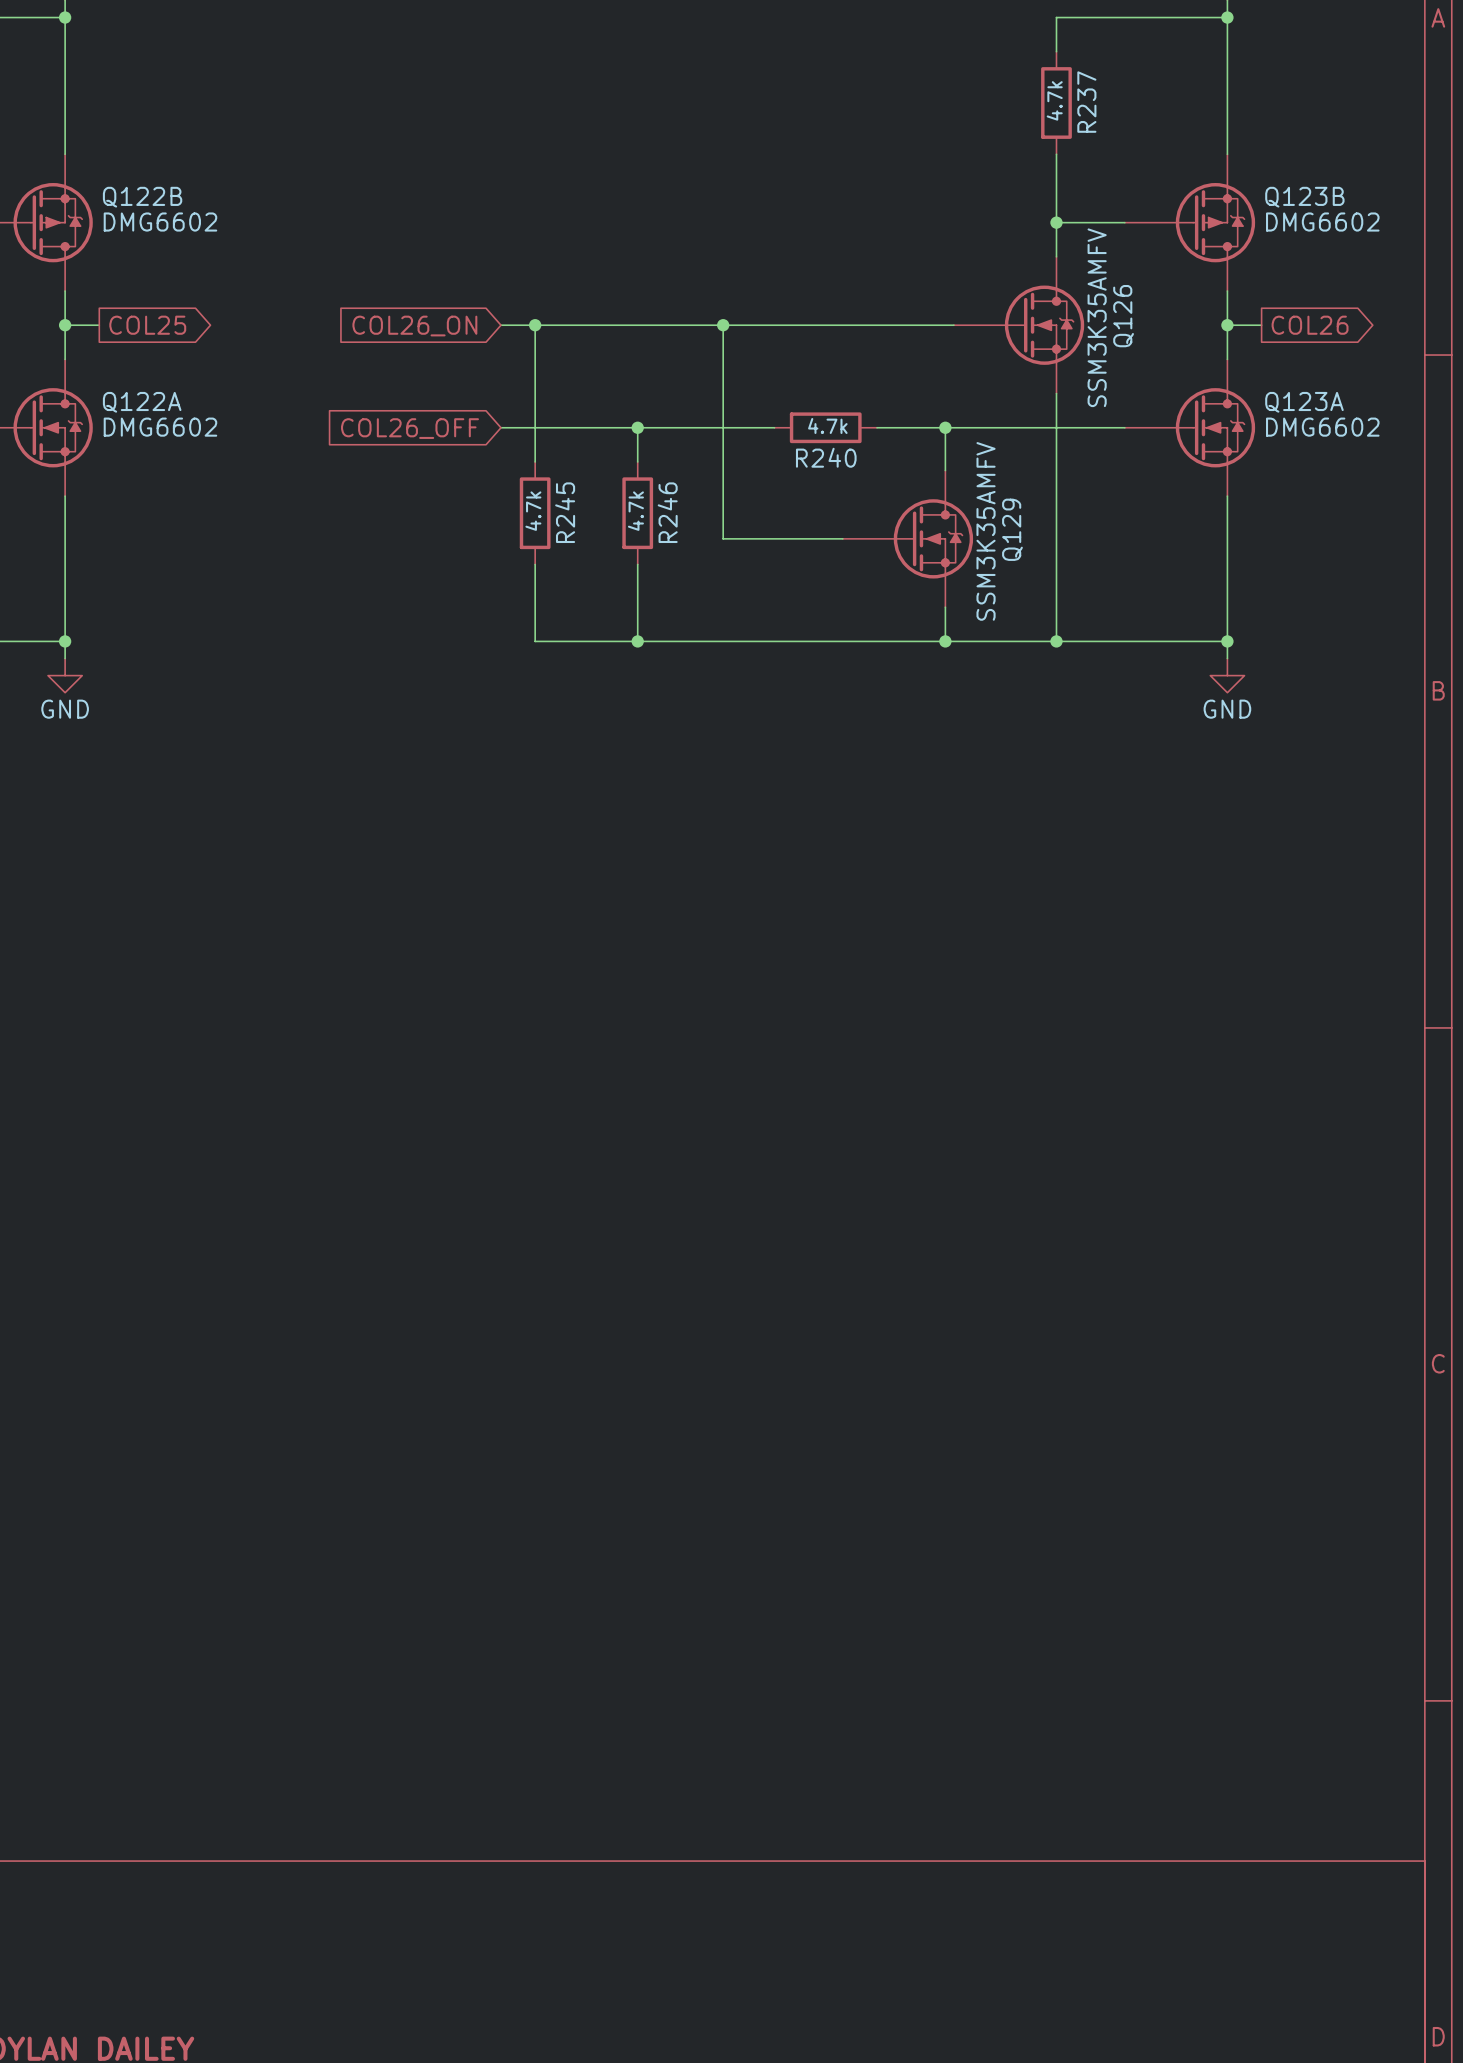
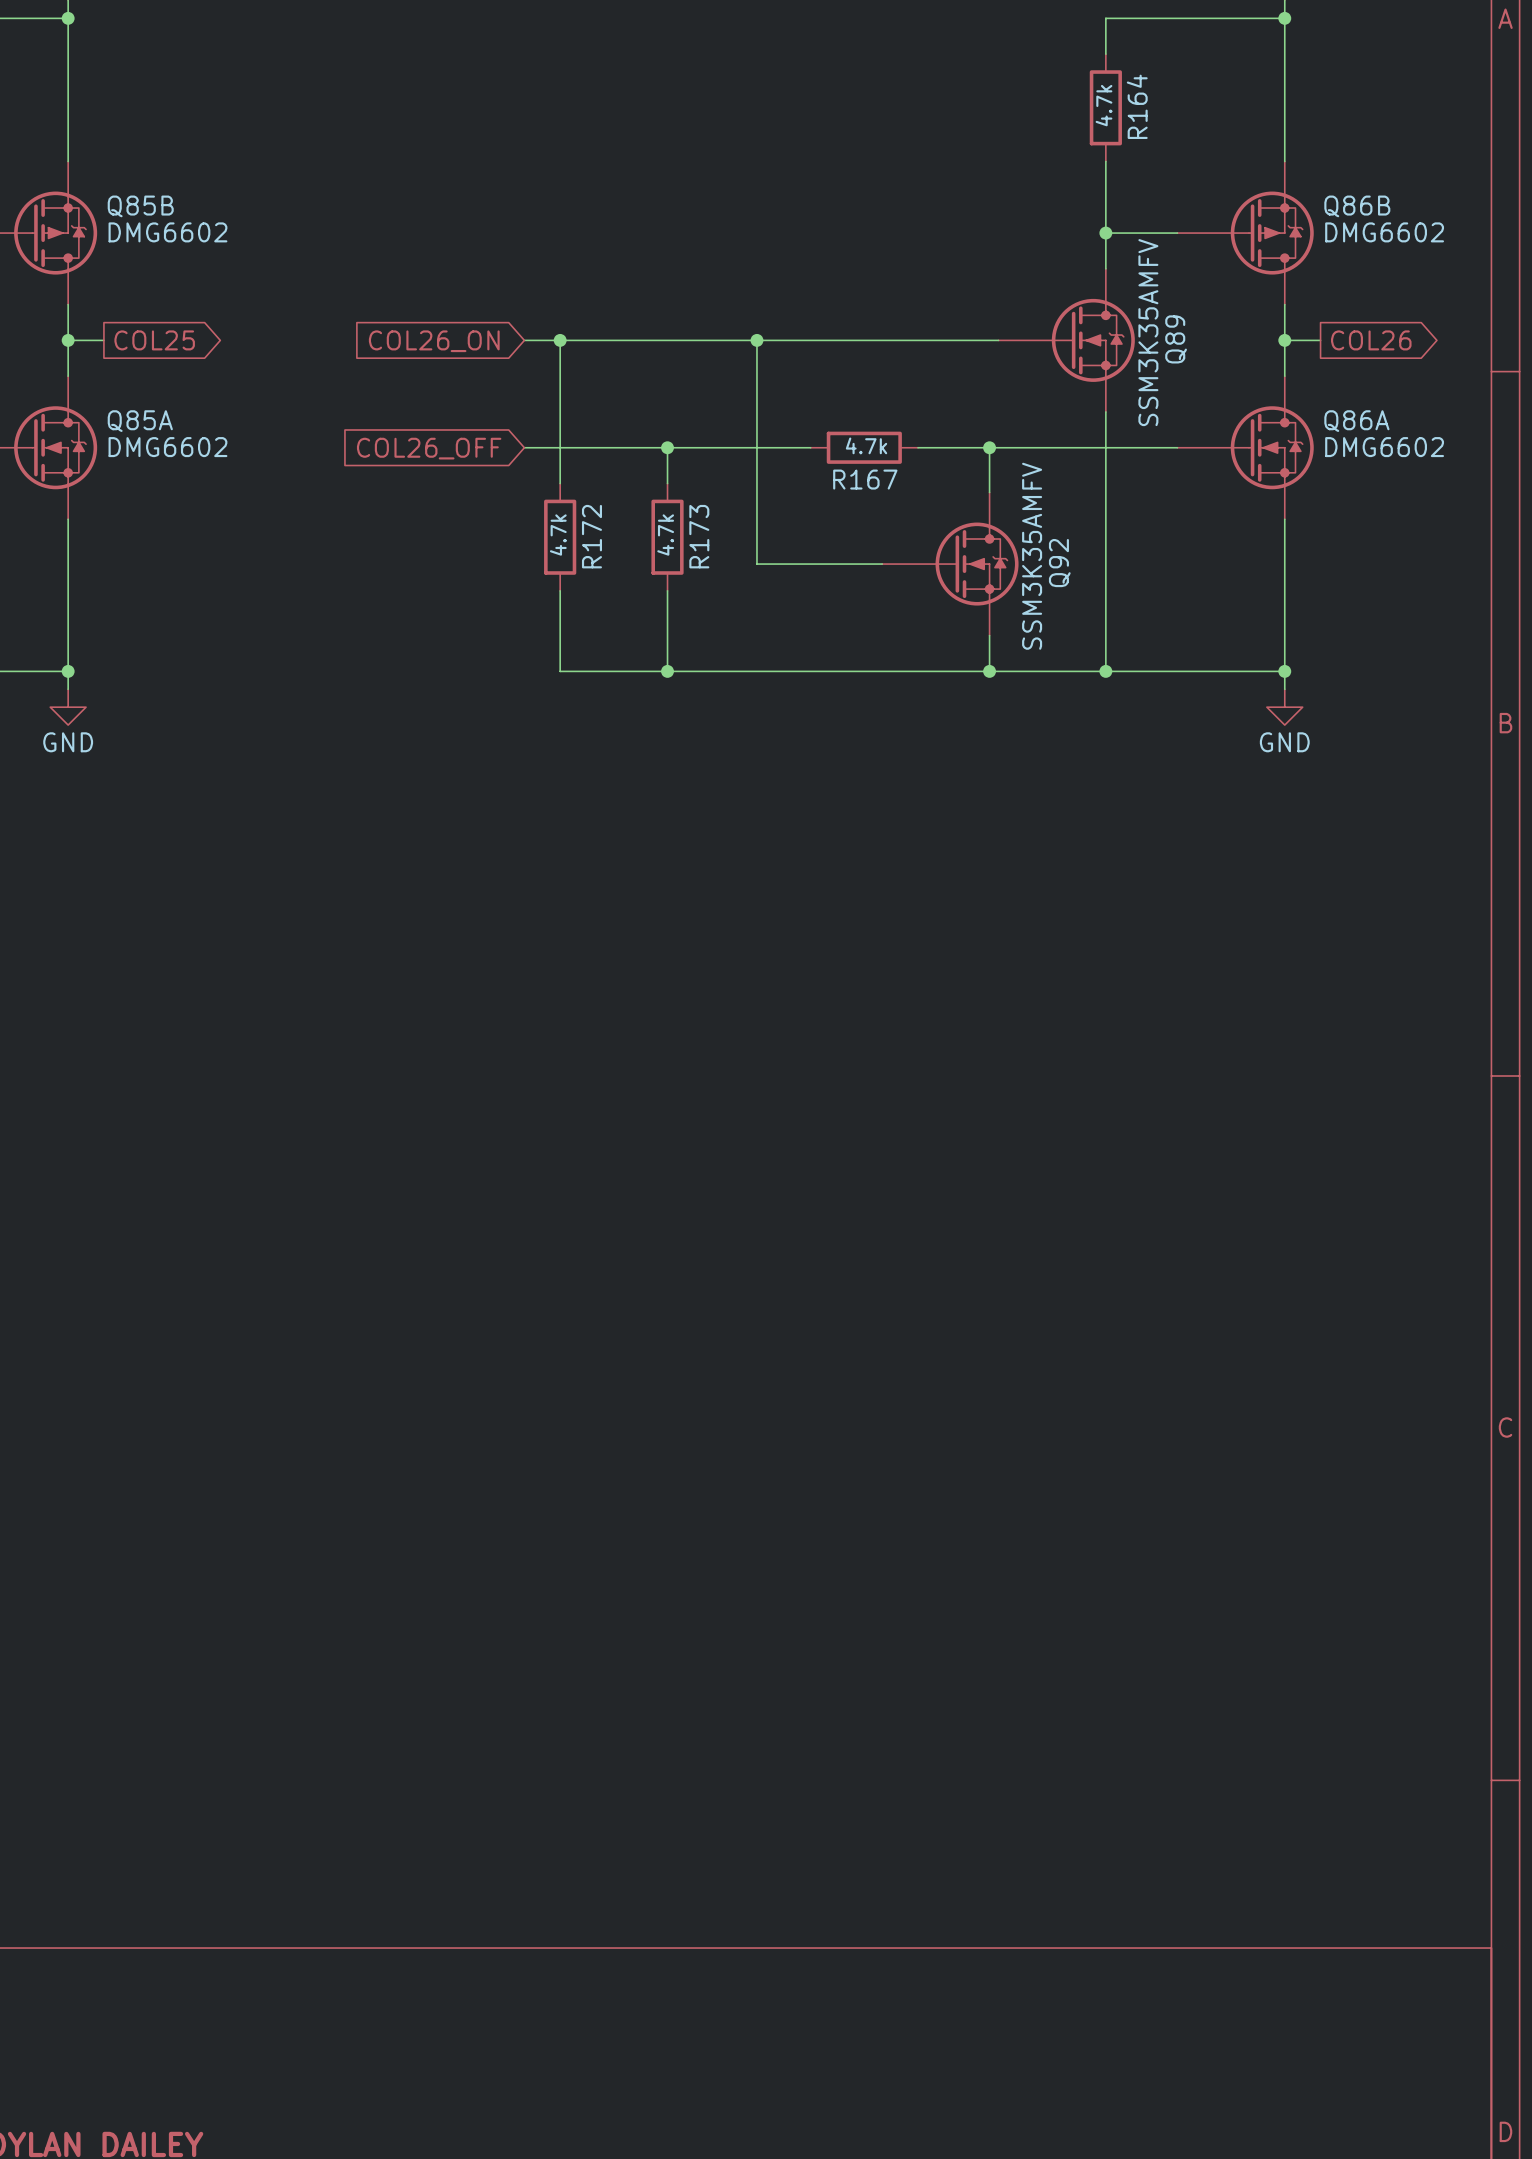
R237 name: R237 (1086, 102) -> R164 (1137, 106)
Q122B name: Q122B (142, 197) -> Q85B (140, 206)
Q123B name: Q123B (1304, 197) -> Q86B (1357, 206)
Q126 name: Q126 (1123, 316) -> Q89 (1176, 339)
Q122A name: Q122A (142, 402) -> Q85A (140, 421)
Q123A name: Q123A (1304, 402) -> Q86A (1356, 421)
R240 name: R240 (826, 457) -> R167 (865, 479)
R245 name: R245 (565, 512) -> R172 (591, 536)
R246 name: R246 (667, 512) -> R173 (699, 536)
Q129 name: Q129 (1012, 529) -> Q92 (1059, 563)

